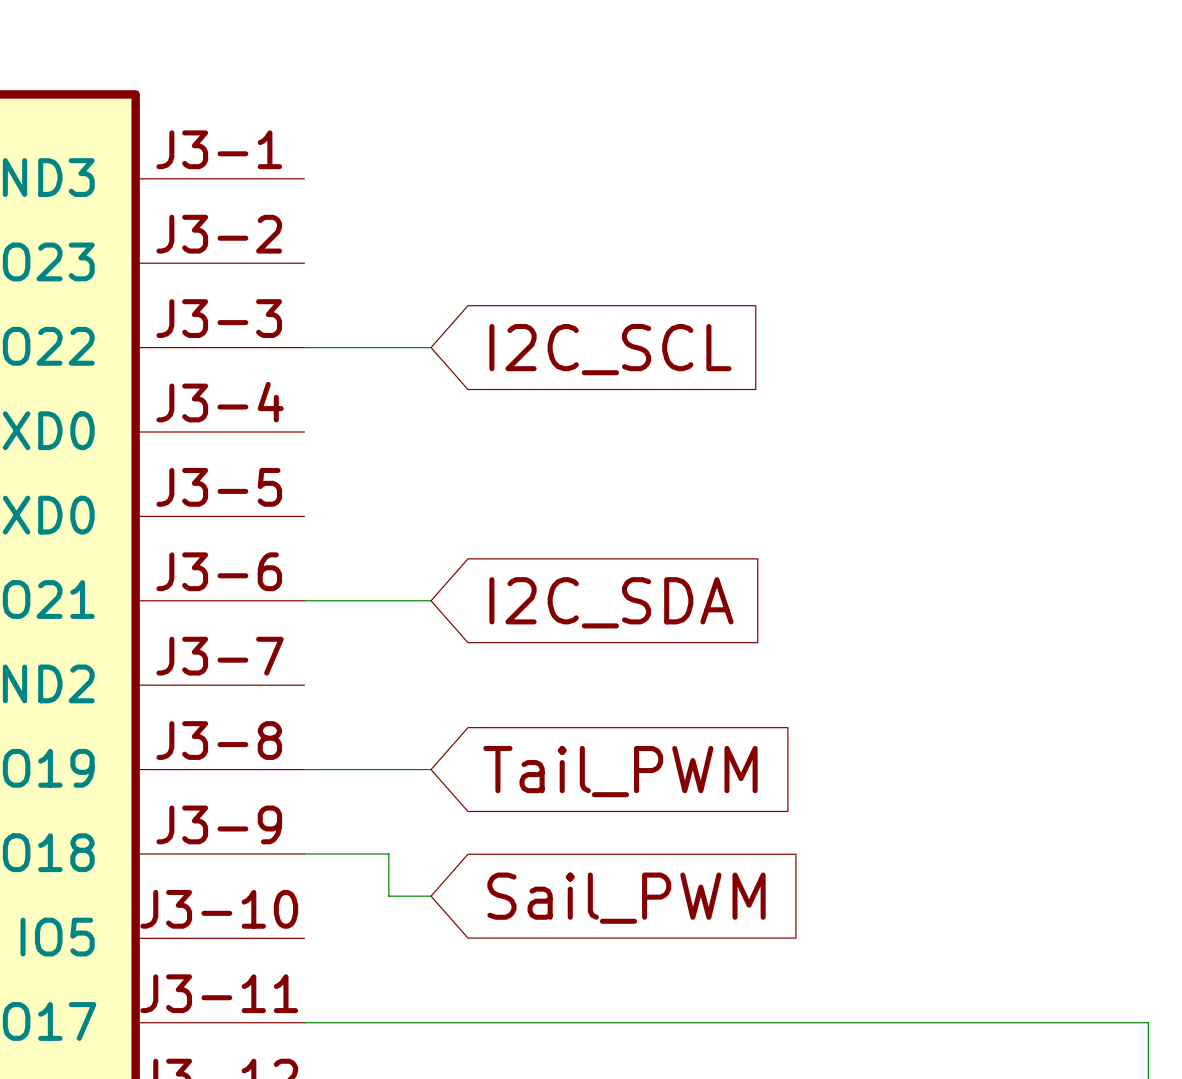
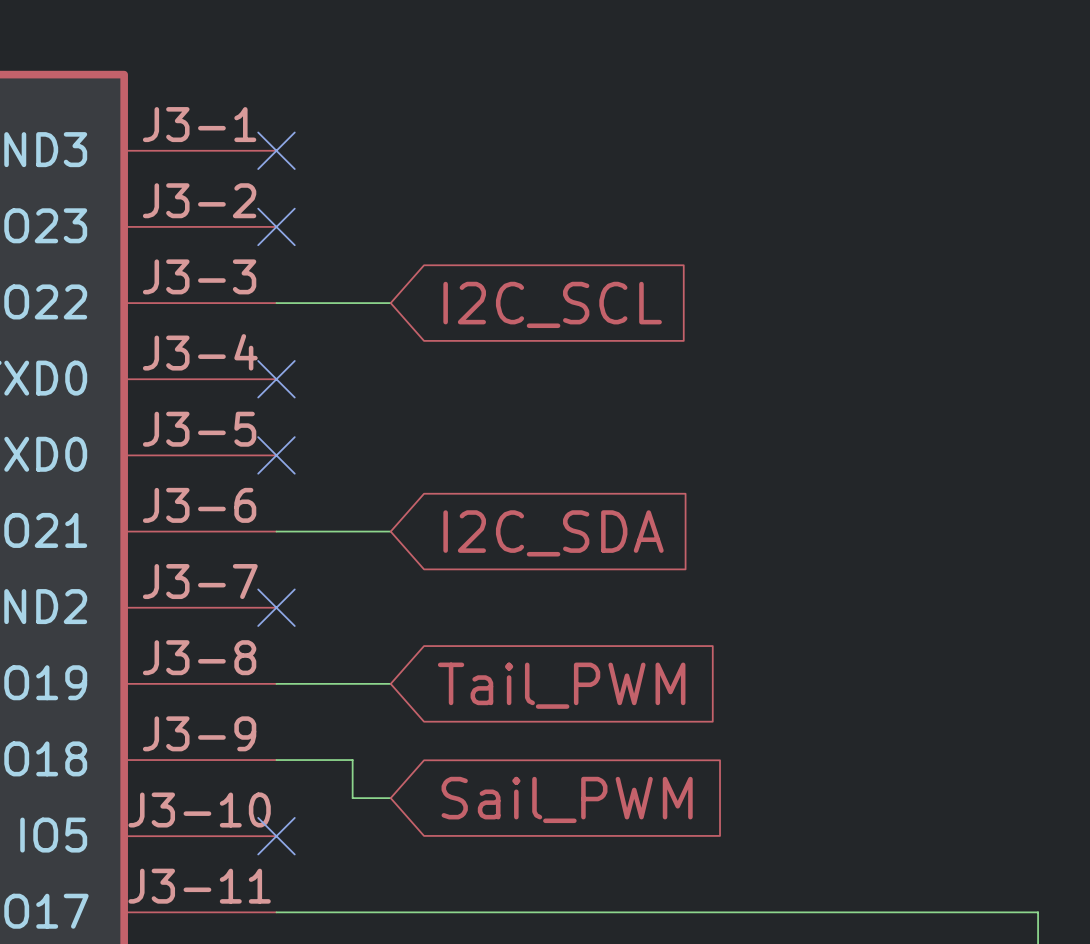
no-connect mark: none -> (276, 150)
no-connect mark: none -> (276, 226)
no-connect mark: none -> (276, 379)
no-connect mark: none -> (276, 455)
no-connect mark: none -> (276, 607)
no-connect mark: none -> (276, 836)

